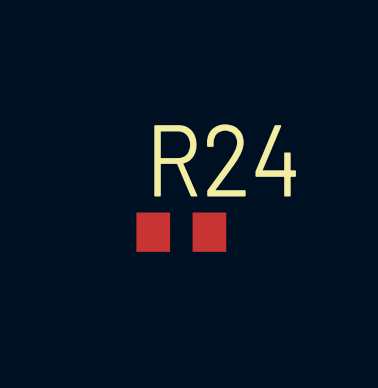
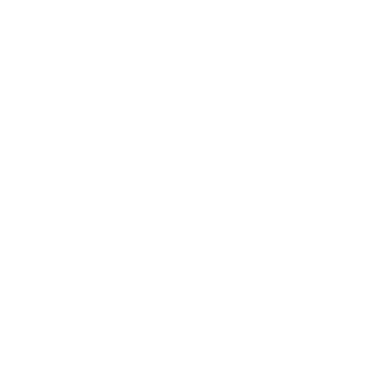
R24: (181, 232) -> none

